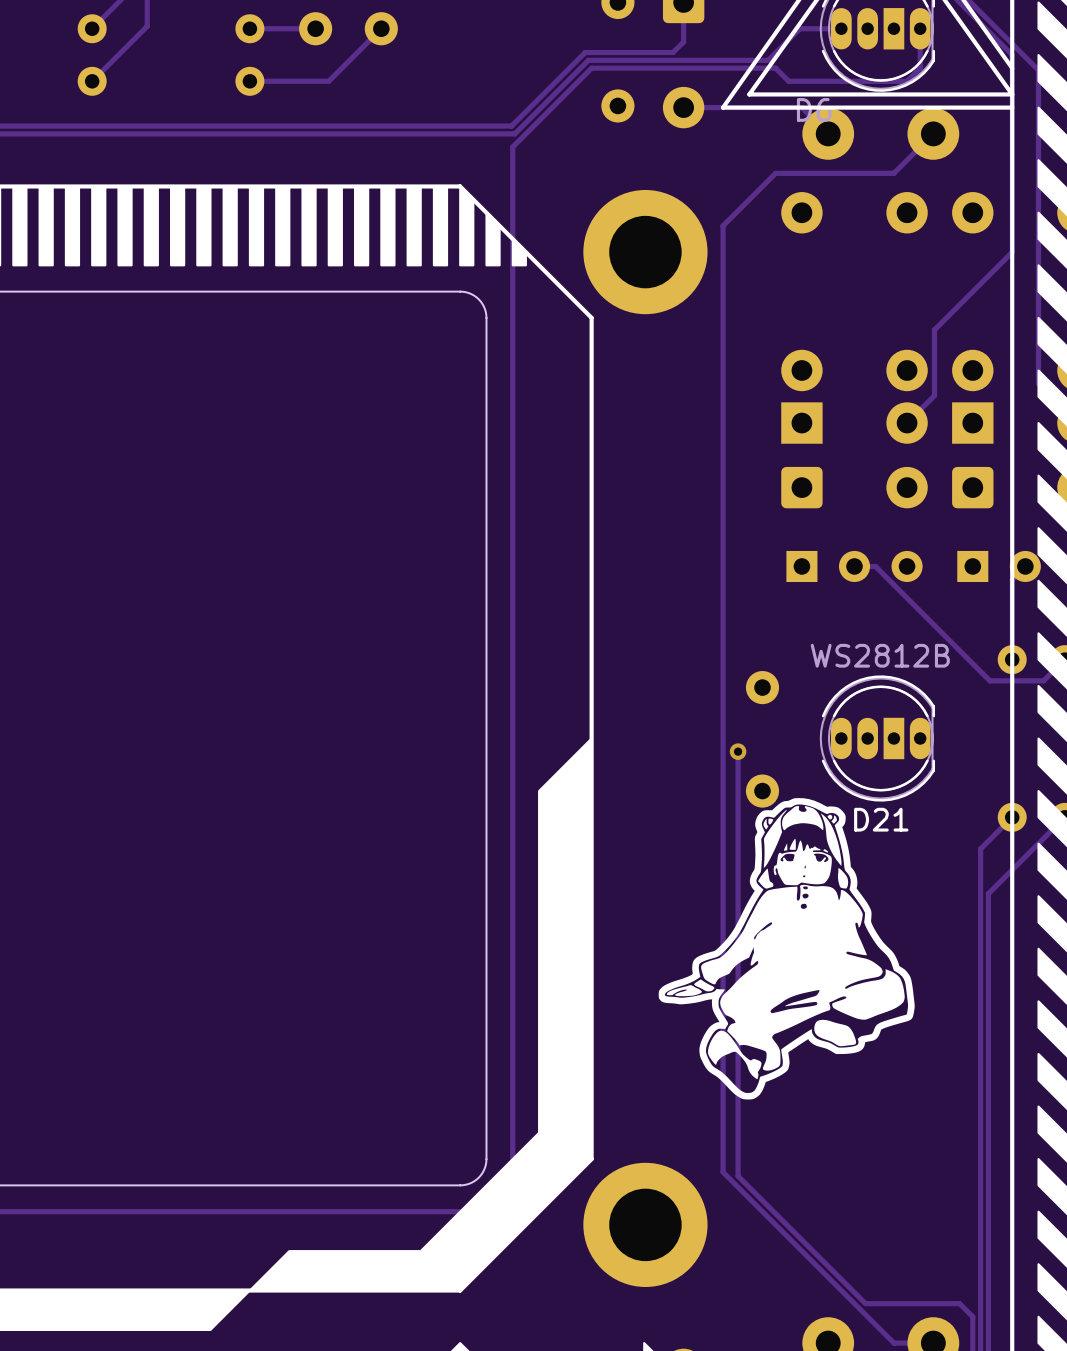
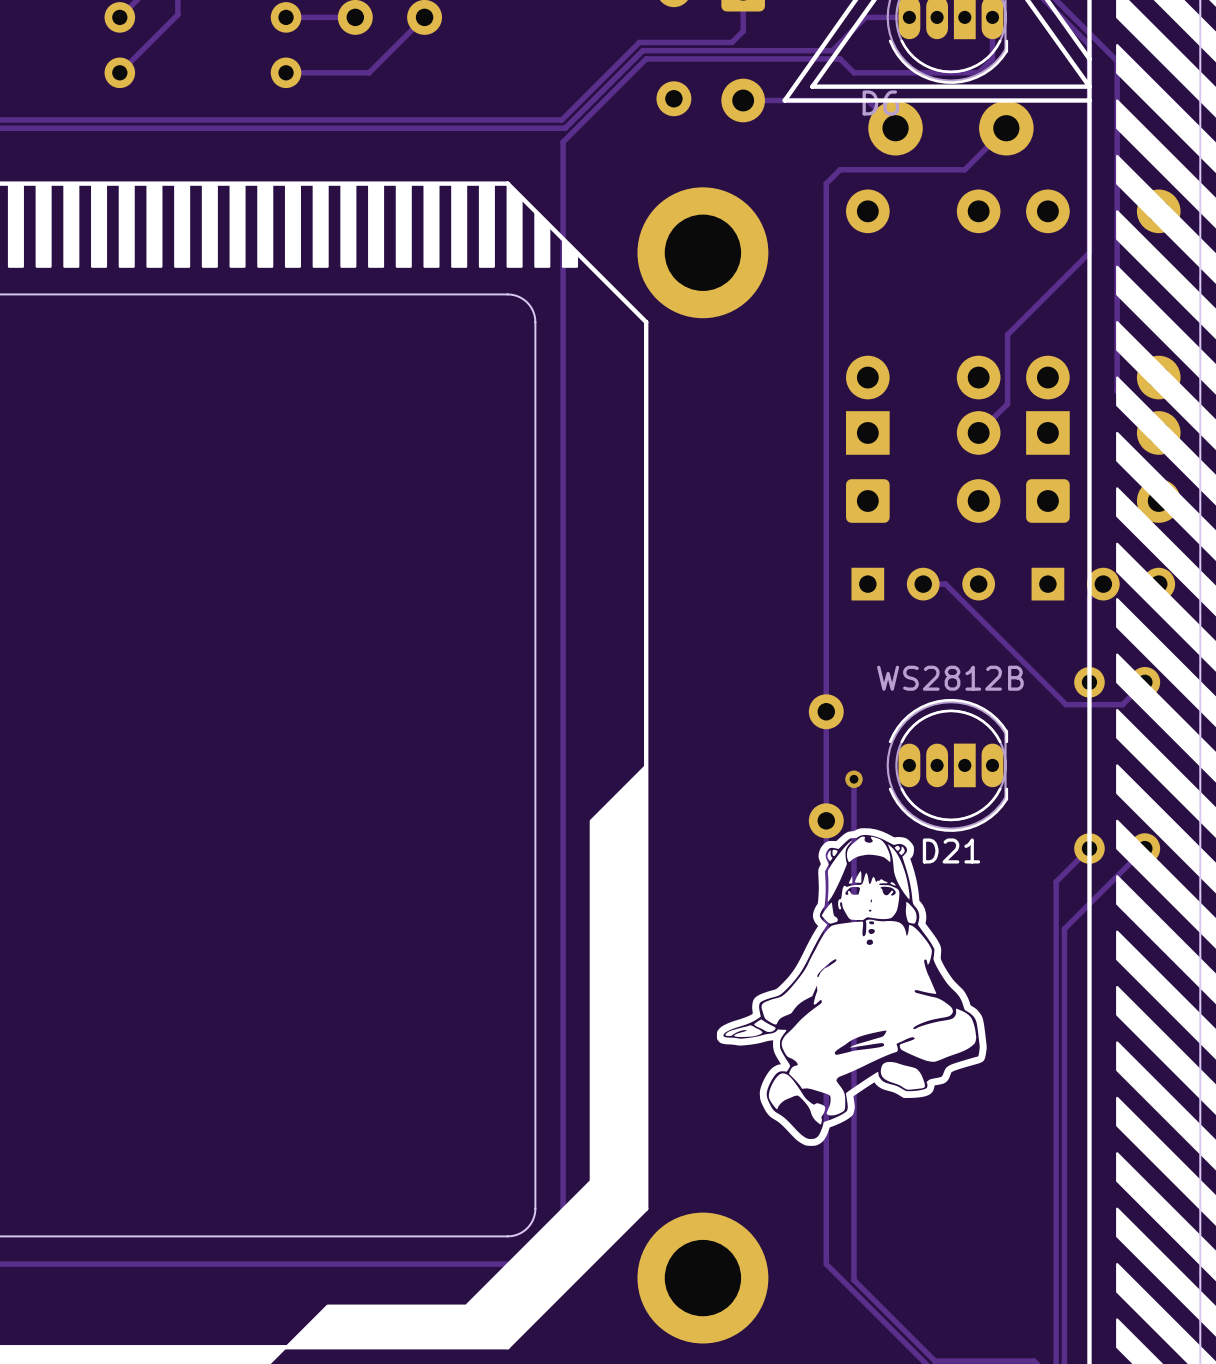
track: (762, 186) (723, 225) (723, 1172) (762, 1211) -> (826, 183) (826, 1264)
track: (738, 751) (738, 1176) (788, 1226) -> (853, 779) (853, 1280)
via position: (738, 751) -> (853, 779)

